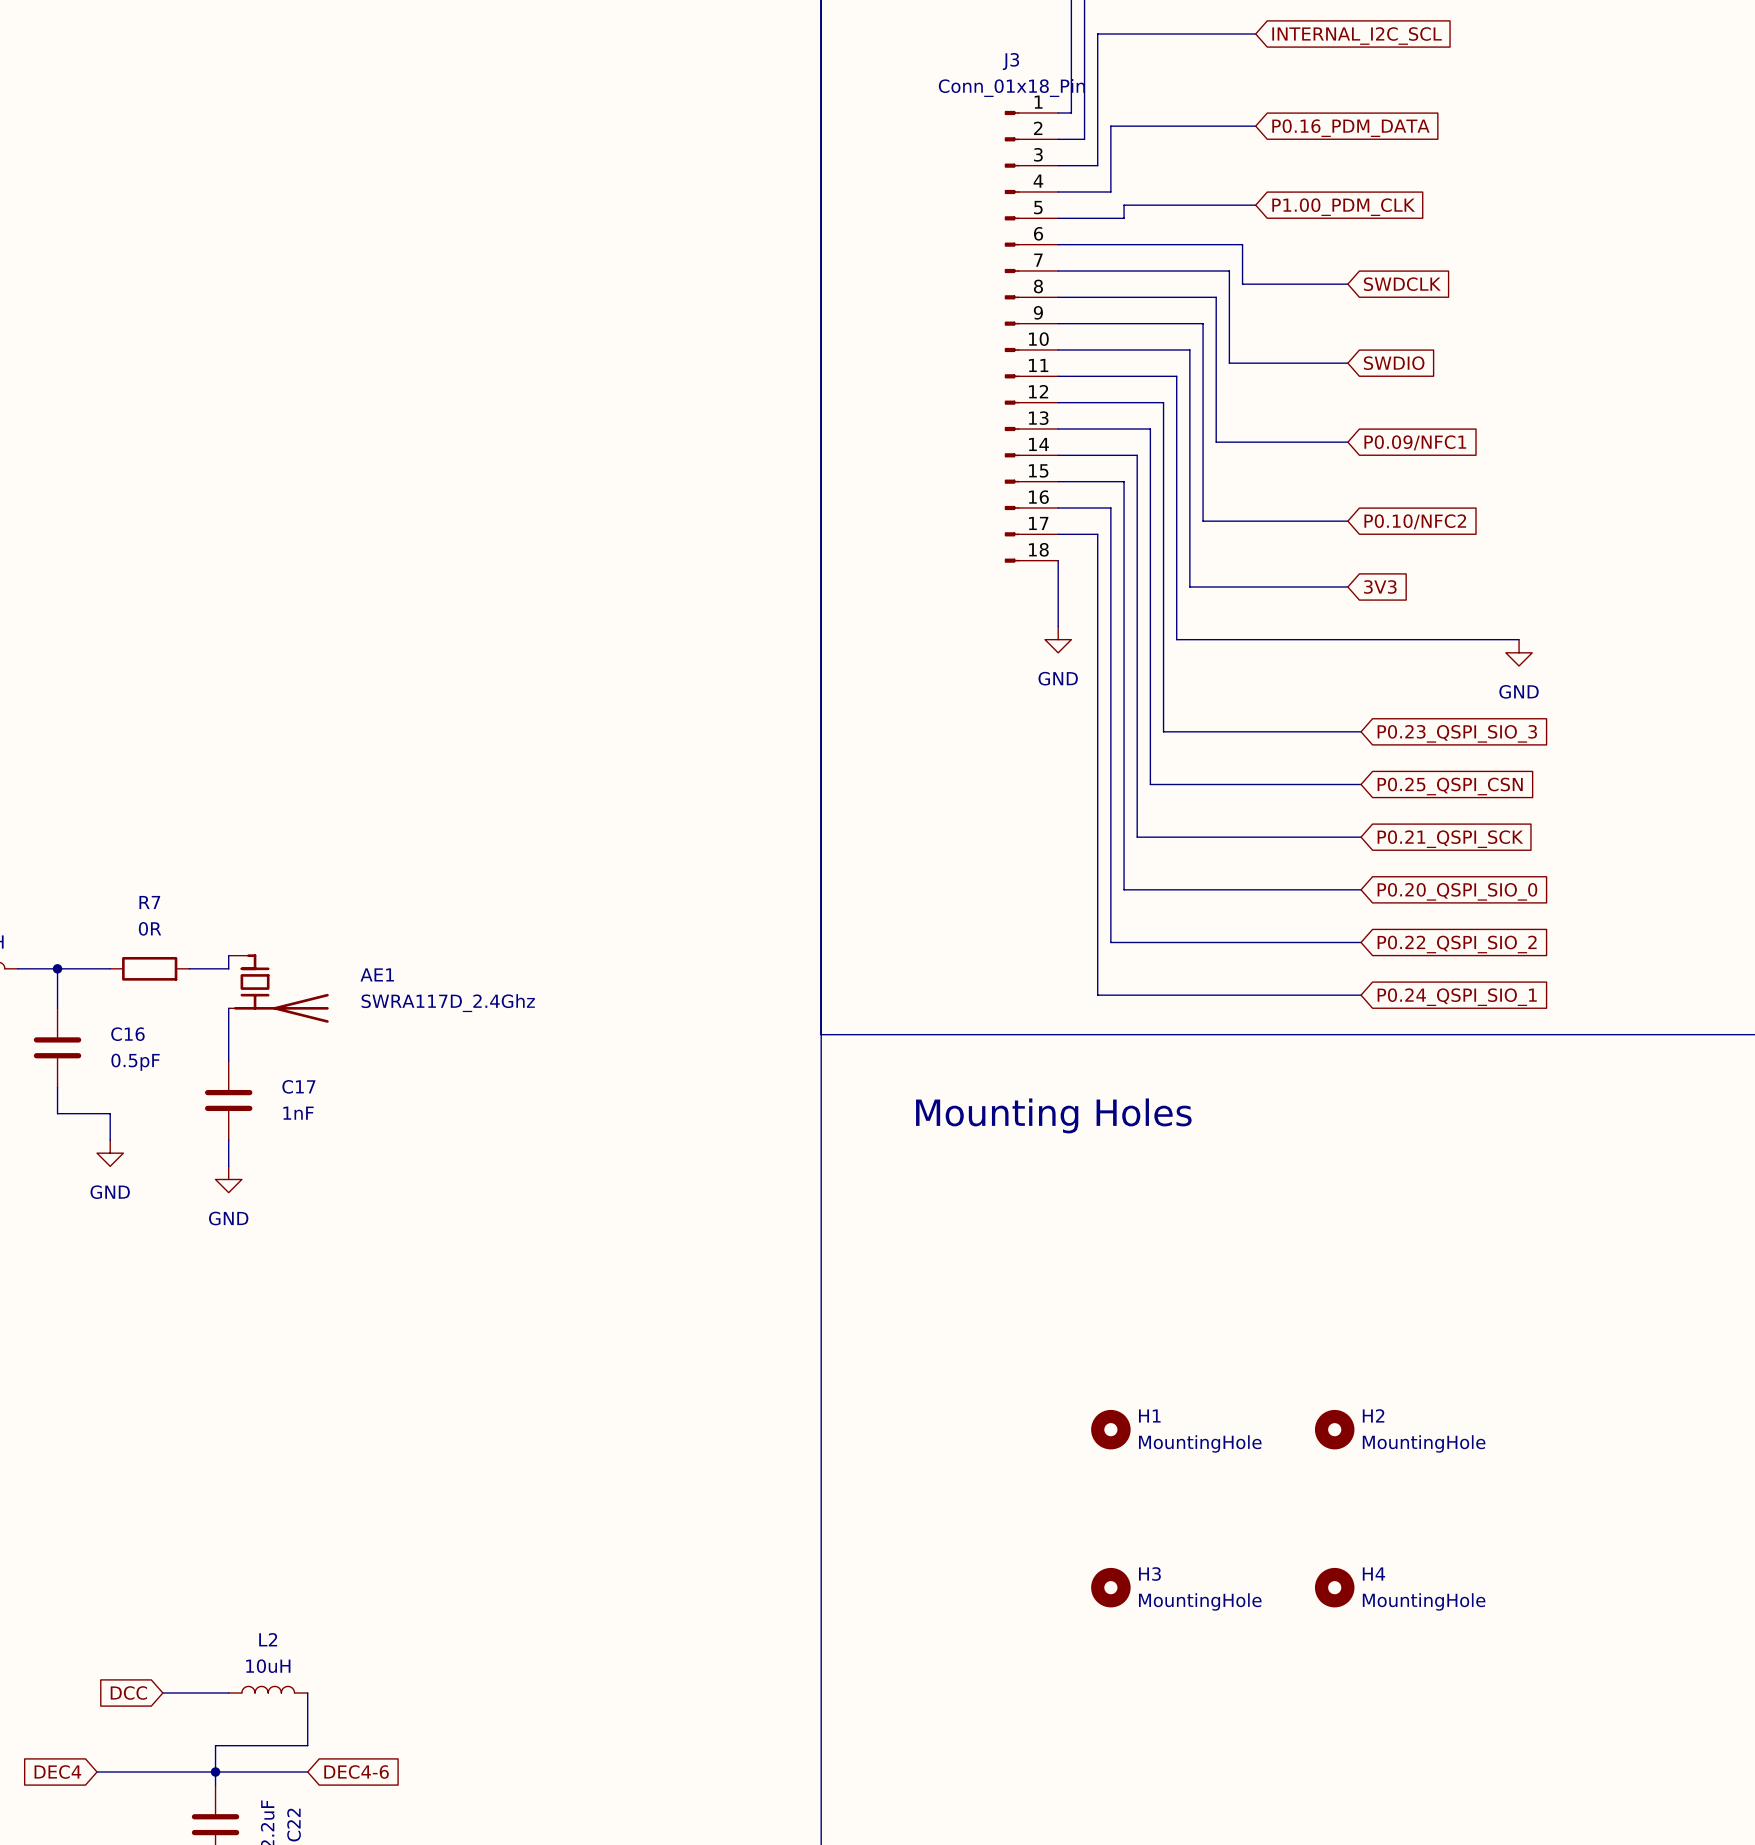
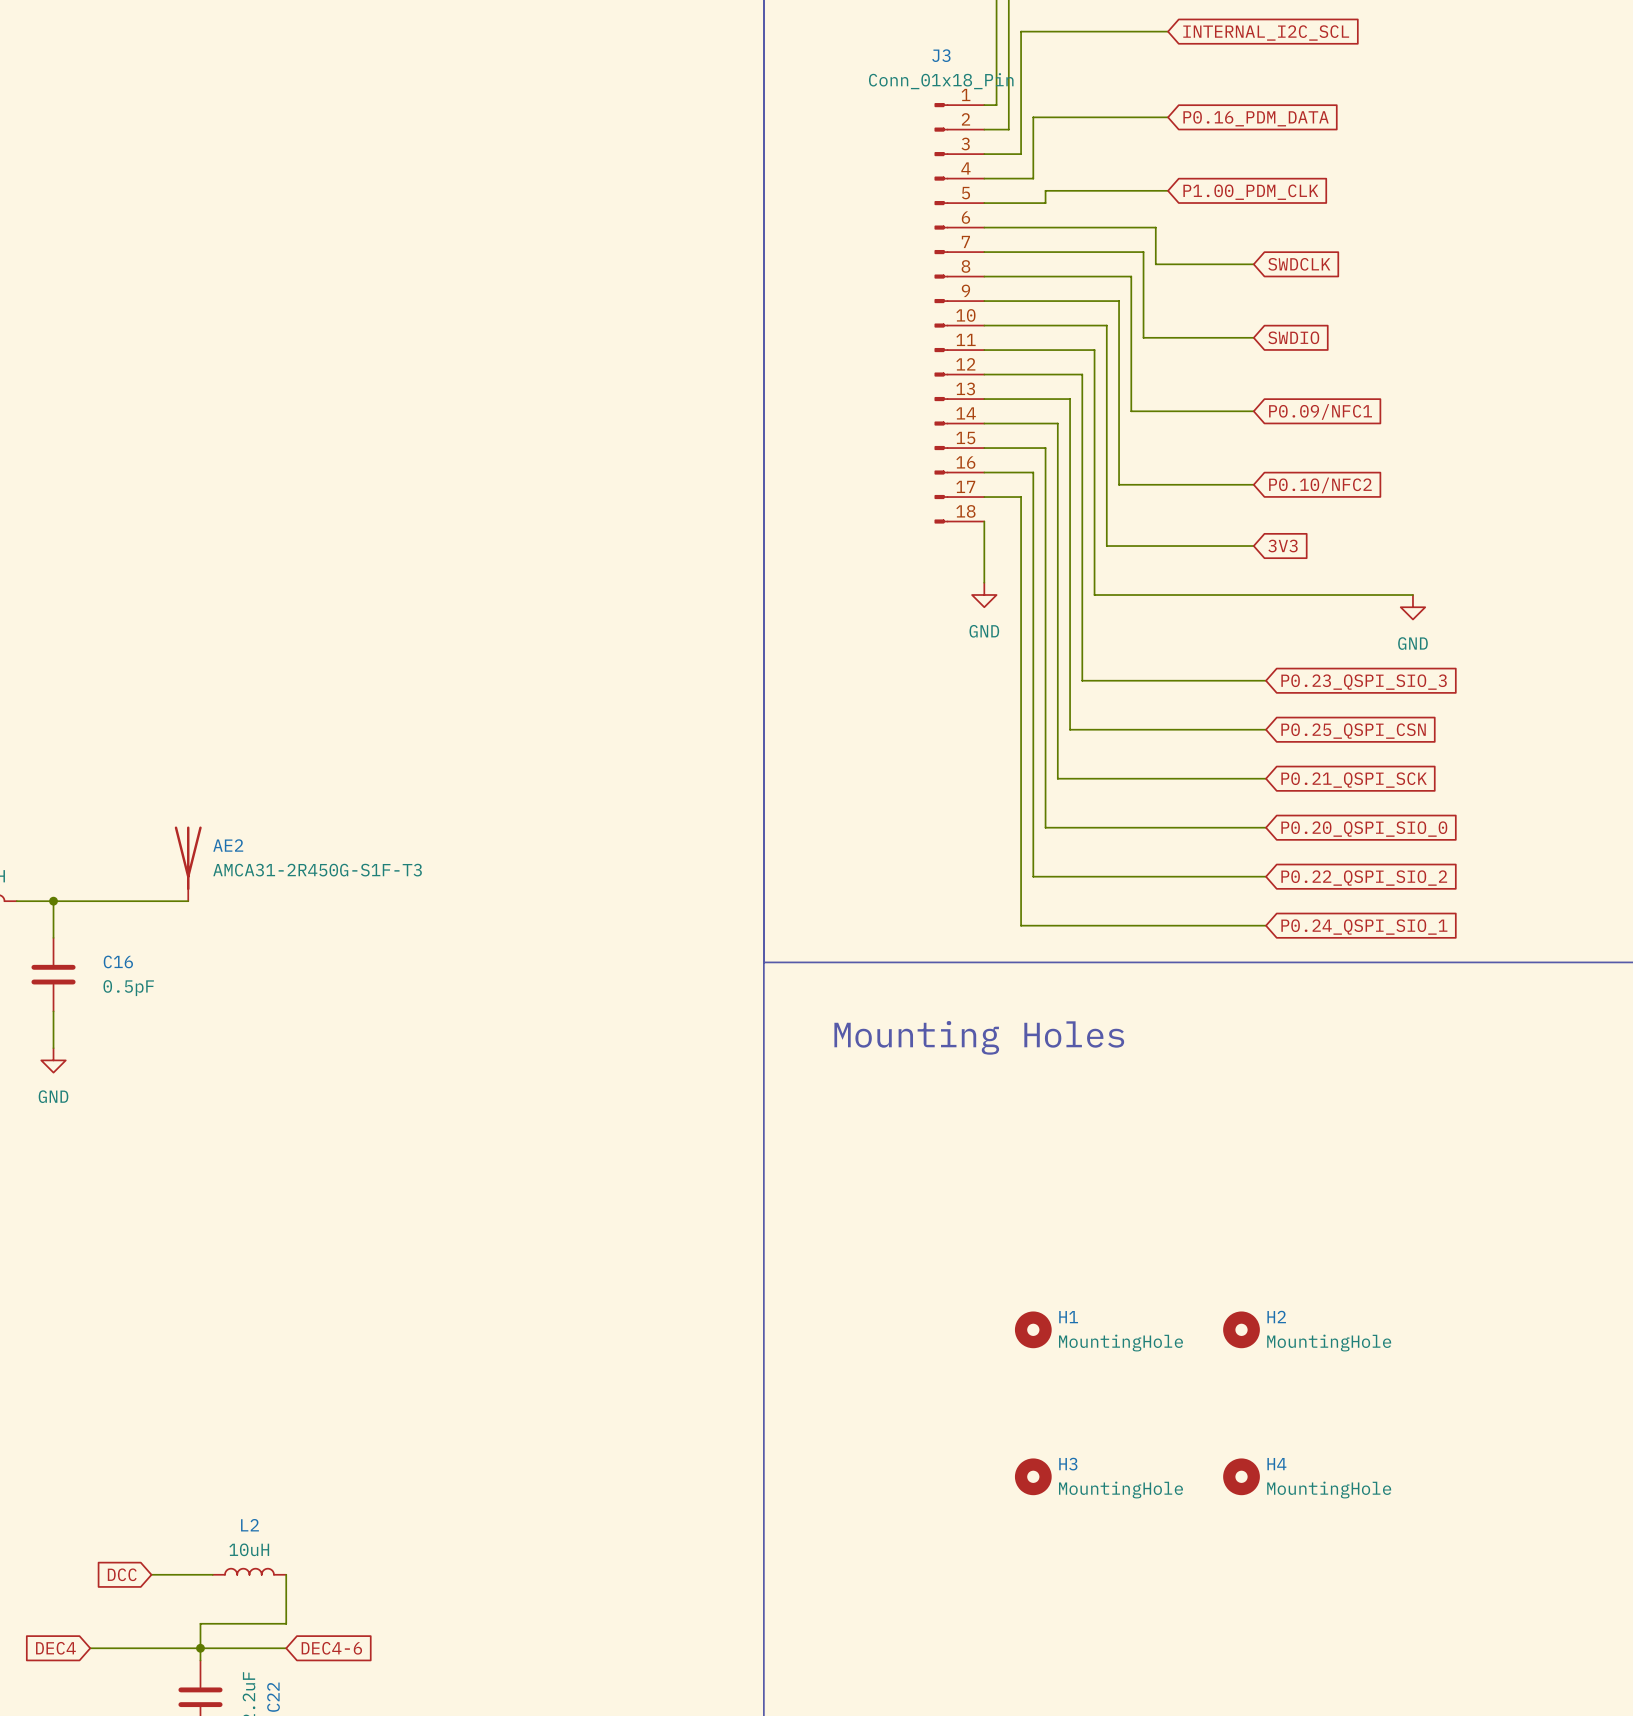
AE2: none -> AMCA31-2R450G-S1F-T3 (188, 863)
wire: (228, 955) (228, 968) (202, 968) -> none
wire: none -> (102, 901) (175, 901)
R7: 0R (149, 968) -> none
AE1: SWRA117D_2.4Ghz (278, 988) -> none
wire: (228, 1008) (228, 1061) -> none
C17: 1nF (228, 1100) -> none
wire: (57, 1113) (110, 1113) (110, 1140) -> (53, 1035) (53, 1048)
wire: (228, 1140) (228, 1166) -> none
power symbol position: GND (110, 1153) -> GND (53, 1060)
power symbol: GND (228, 1179) -> none

